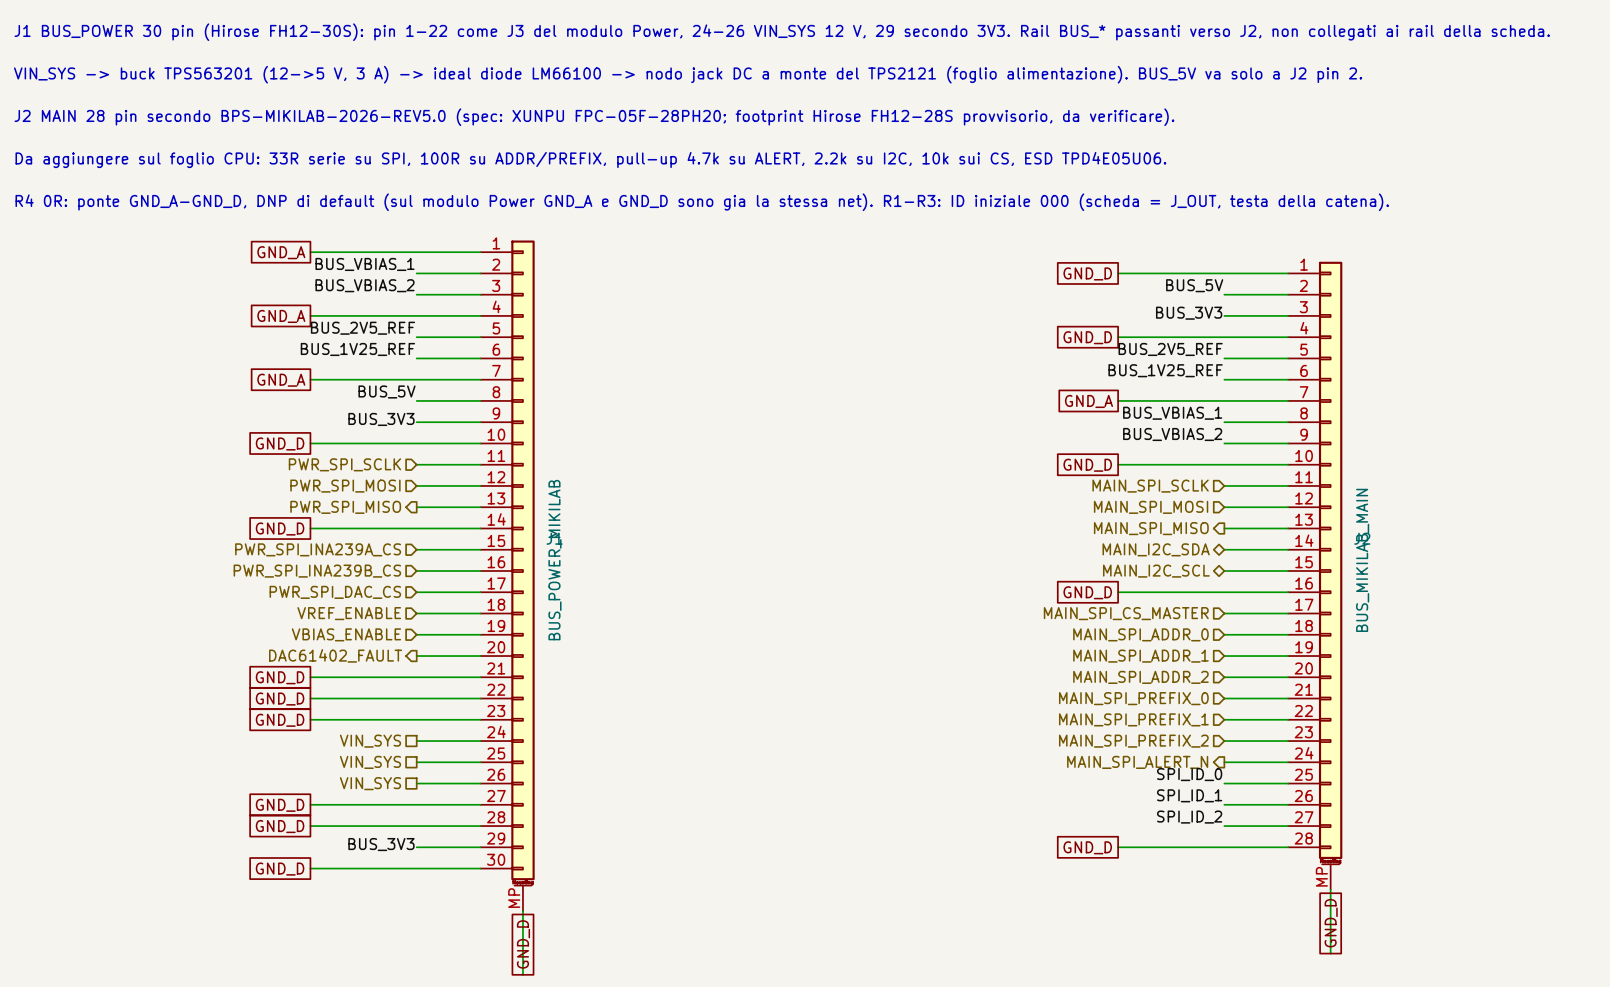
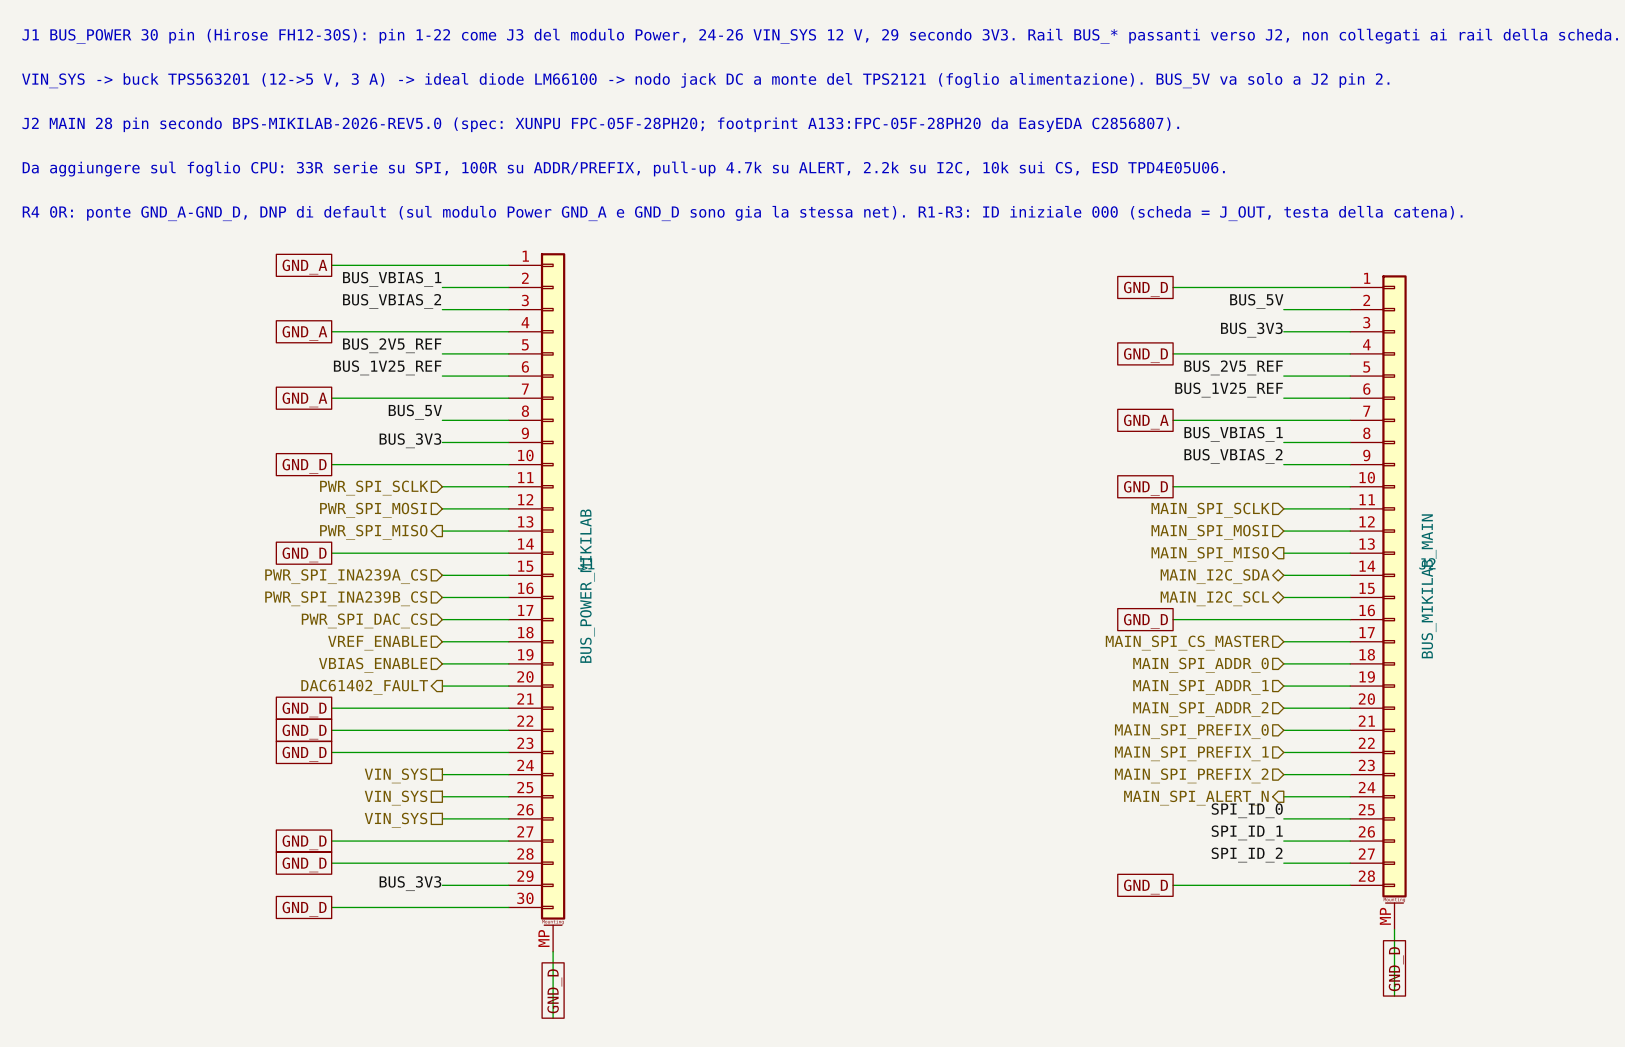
text: J2 MAIN 28 pin secondo BPS-MIKILAB-2026-REV5.0 (spec: XUNPU FPC-05F-28PH20; footprint Hirose FH12-28S provvisorio, da verificare). (594, 117) -> J2 MAIN 28 pin secondo BPS-MIKILAB-2026-REV5.0 (spec: XUNPU FPC-05F-28PH20; footprint A133:FPC-05F-28PH20 da EasyEDA C2856807). (600, 124)

